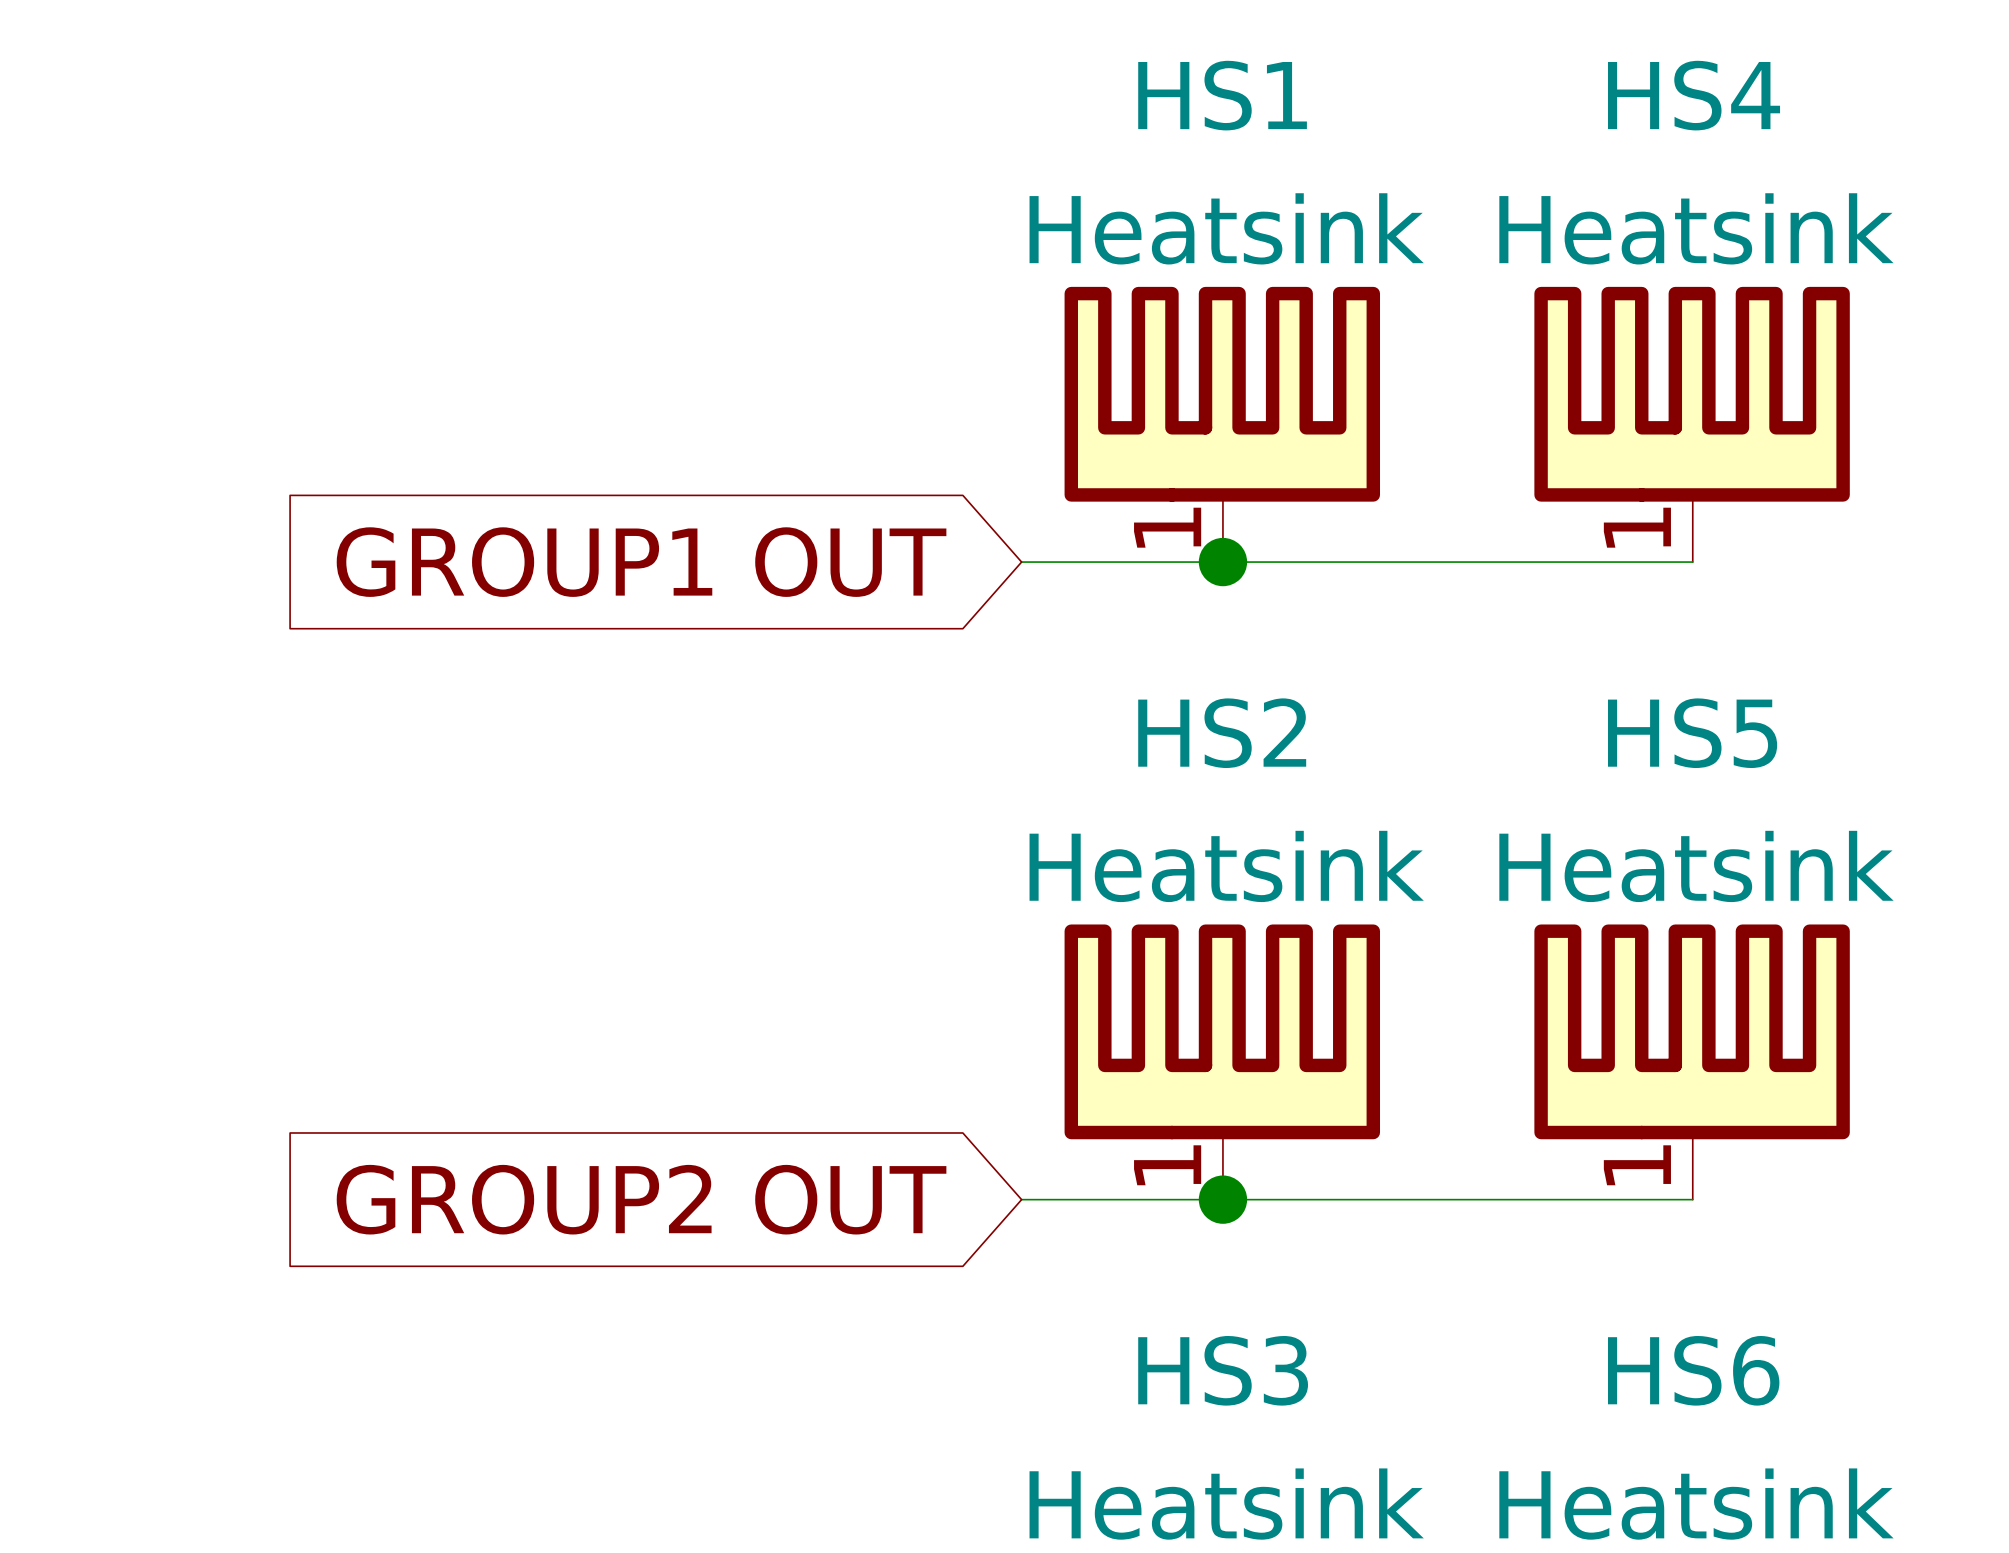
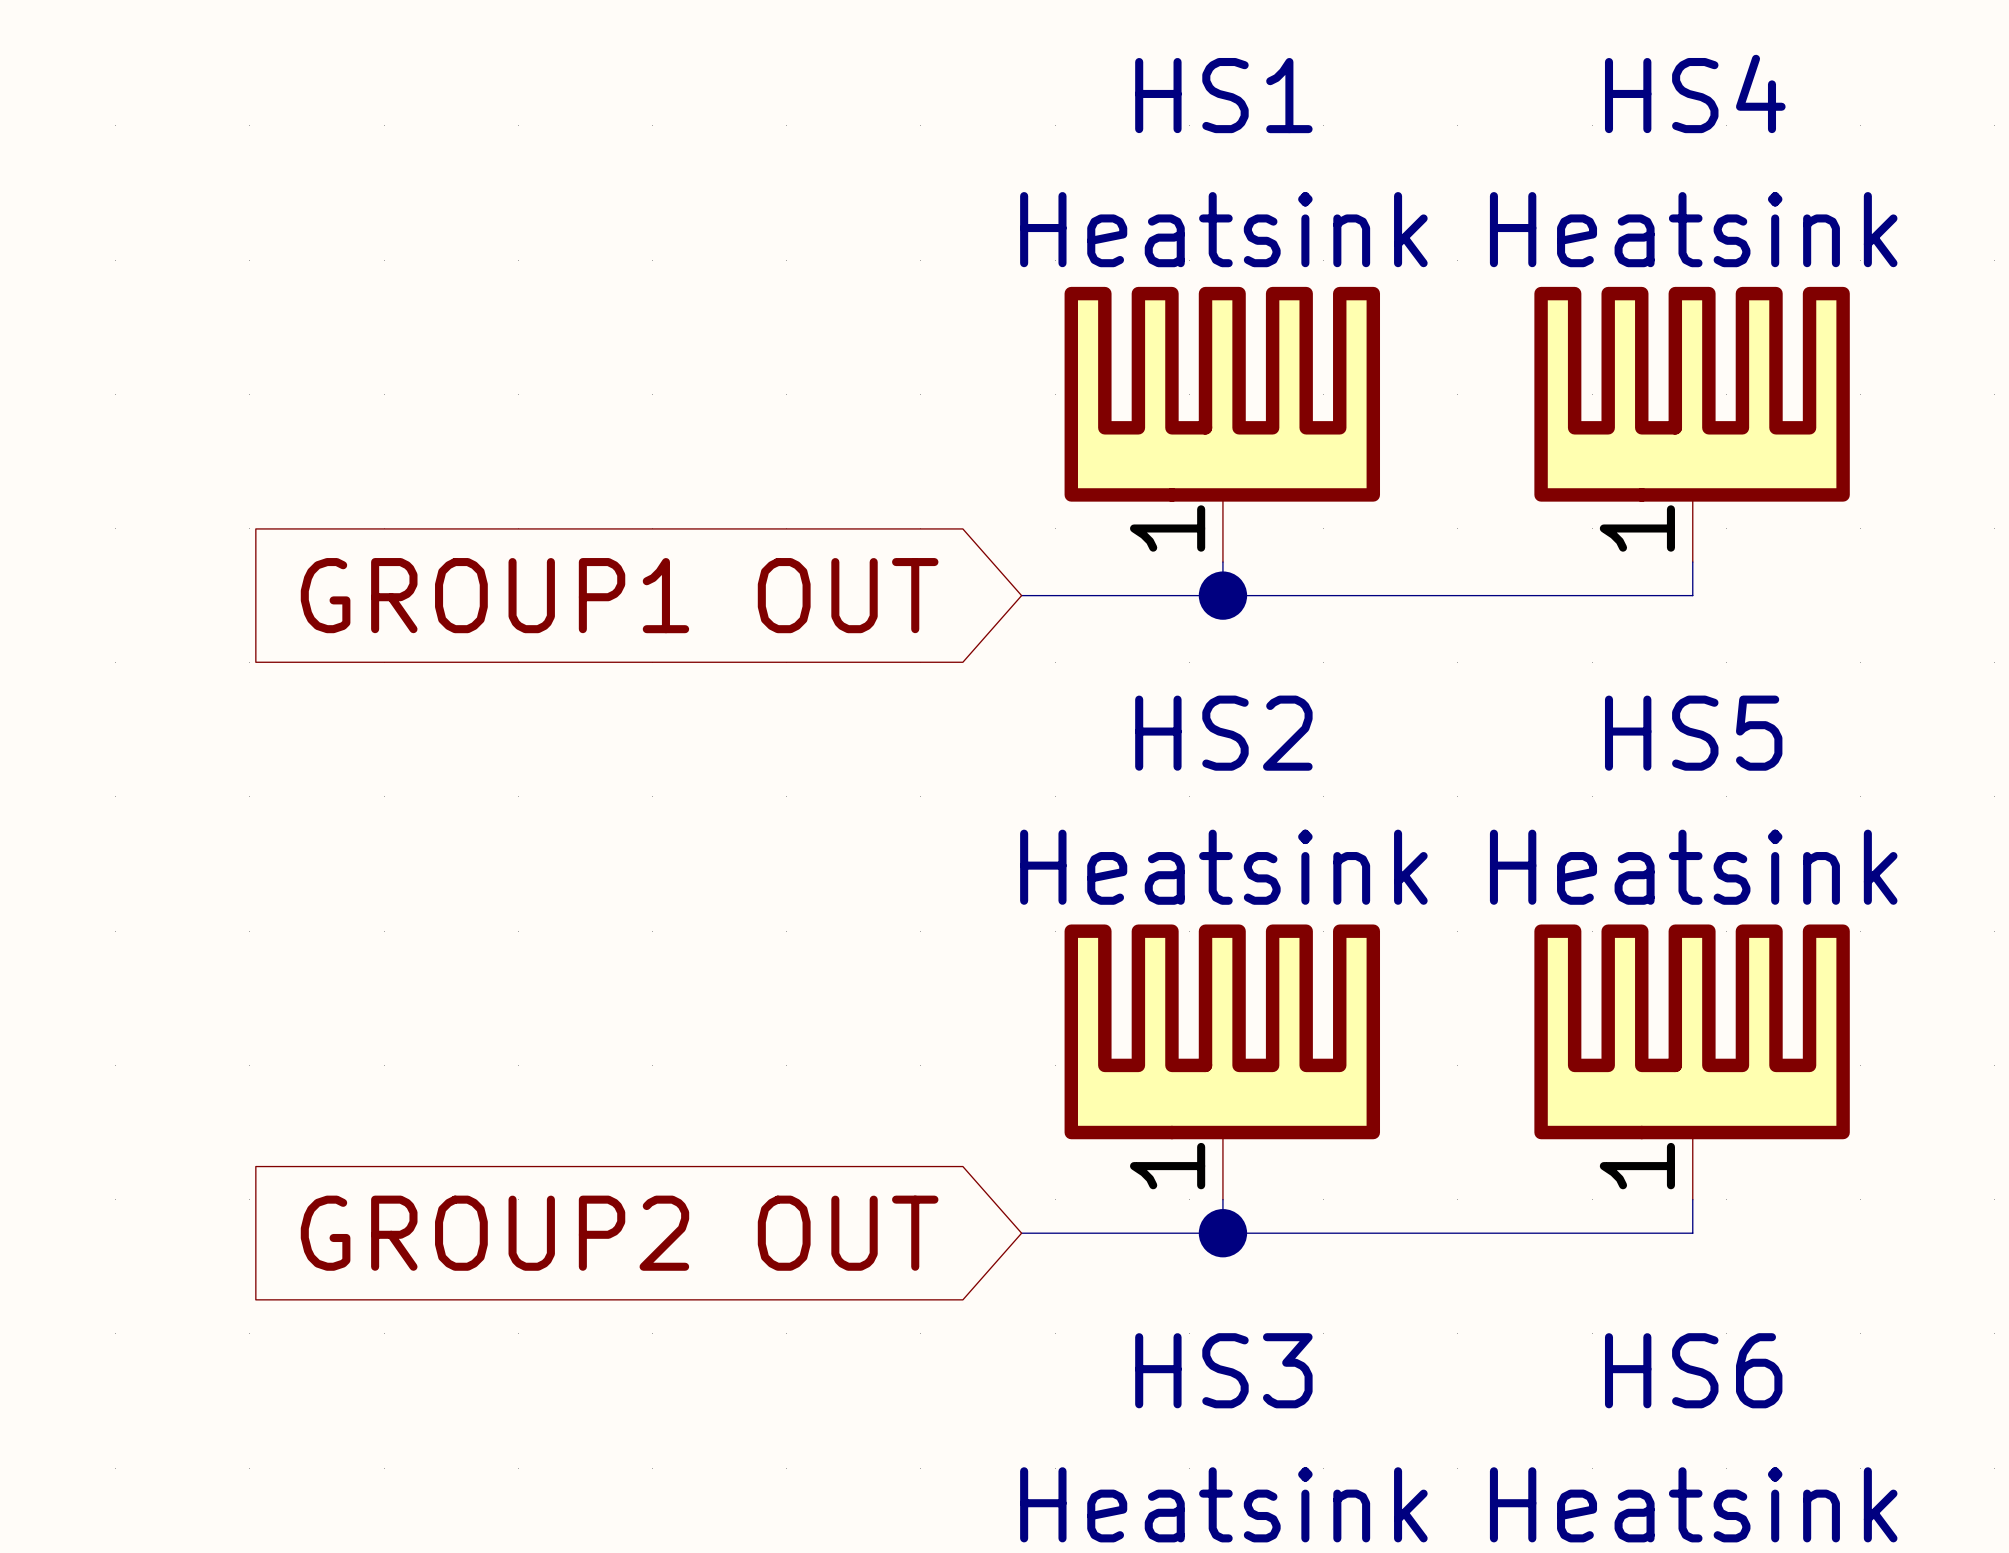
global label position: GROUP1 OUT (641, 562) -> GROUP1 OUT (619, 595)
wire: (1021, 562) (1692, 562) -> (1021, 595) (1692, 595) (1692, 562)
junction position: (1222, 562) -> (1222, 595)
global label position: GROUP2 OUT (641, 1199) -> GROUP2 OUT (619, 1233)
wire: (1021, 1199) (1692, 1199) -> (1021, 1233) (1692, 1233) (1692, 1199)
junction position: (1222, 1199) -> (1222, 1233)

